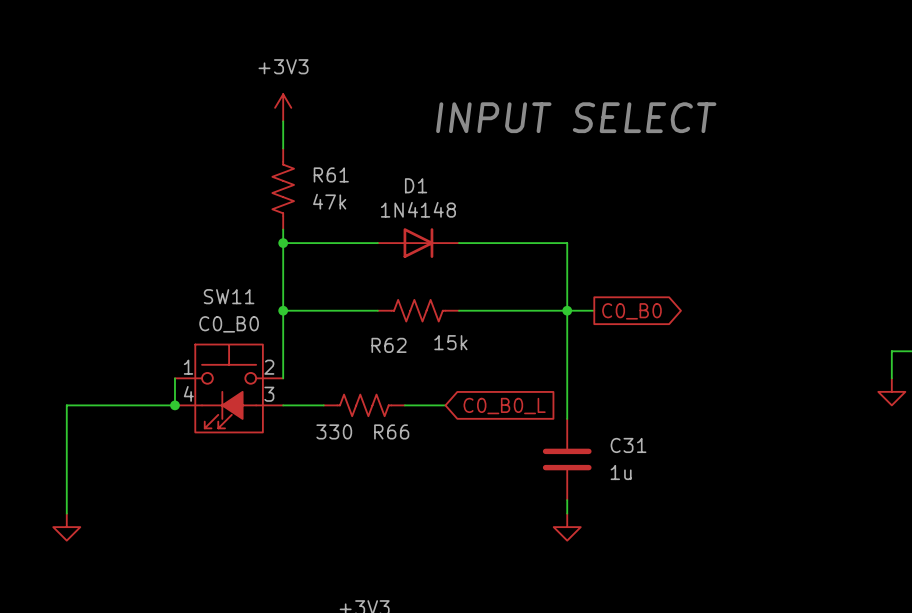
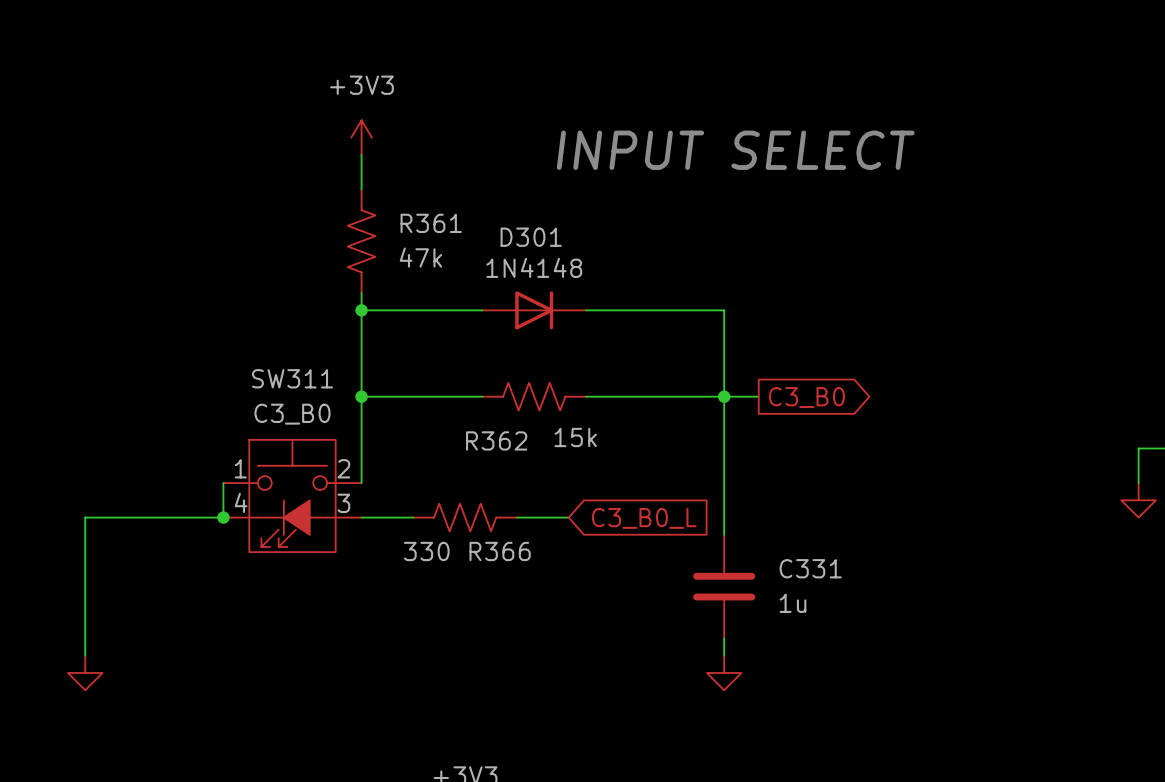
R61 name: R61 (331, 174) -> R361 (431, 223)
D1 name: D1 (416, 185) -> D301 (531, 237)
SW11 name: SW11 (229, 296) -> SW311 (292, 378)
global label: C0_B0 (631, 311) -> C3_B0 (806, 397)
SW11 value: C0_B0 (229, 324) -> C3_B0 (292, 414)
R62 name: R62 (389, 345) -> R362 (496, 440)
global label: C0_B0_L (504, 406) -> C3_B0_L (644, 518)
R66 name: R66 (391, 431) -> R366 (500, 551)
C31 name: C31 (628, 445) -> C331 (810, 568)

